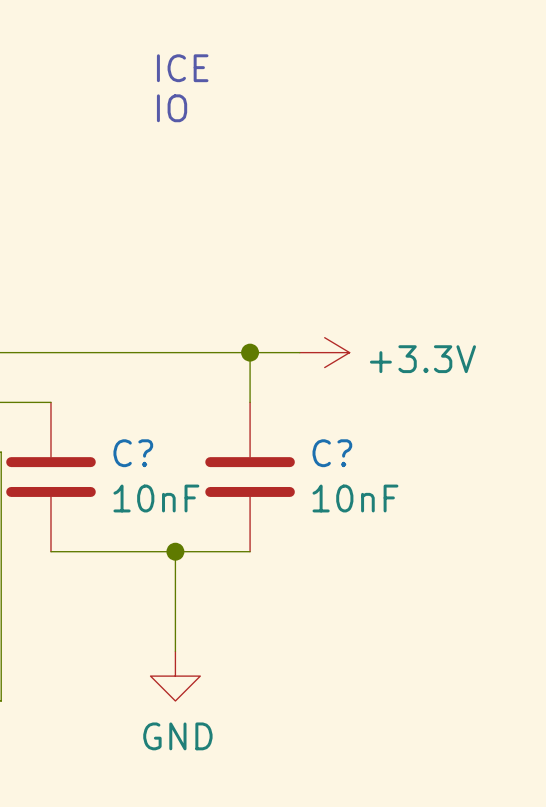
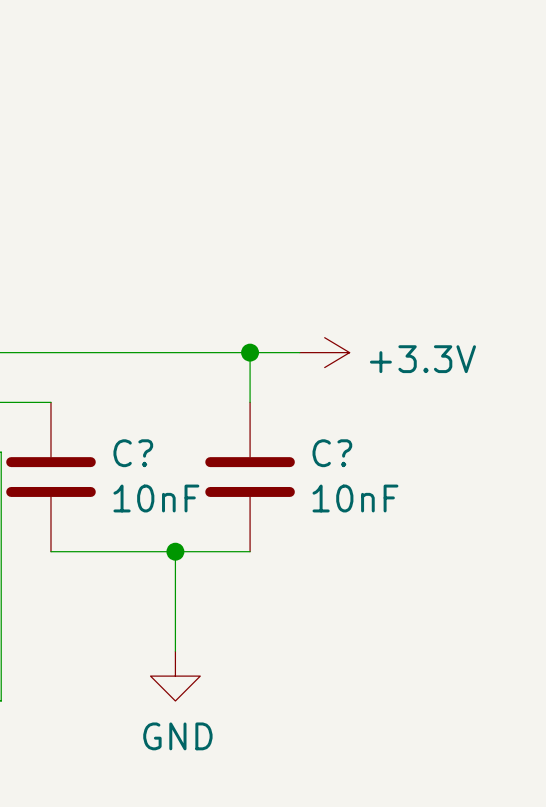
text: ICE (182, 68) -> none
text: IO (172, 108) -> none

